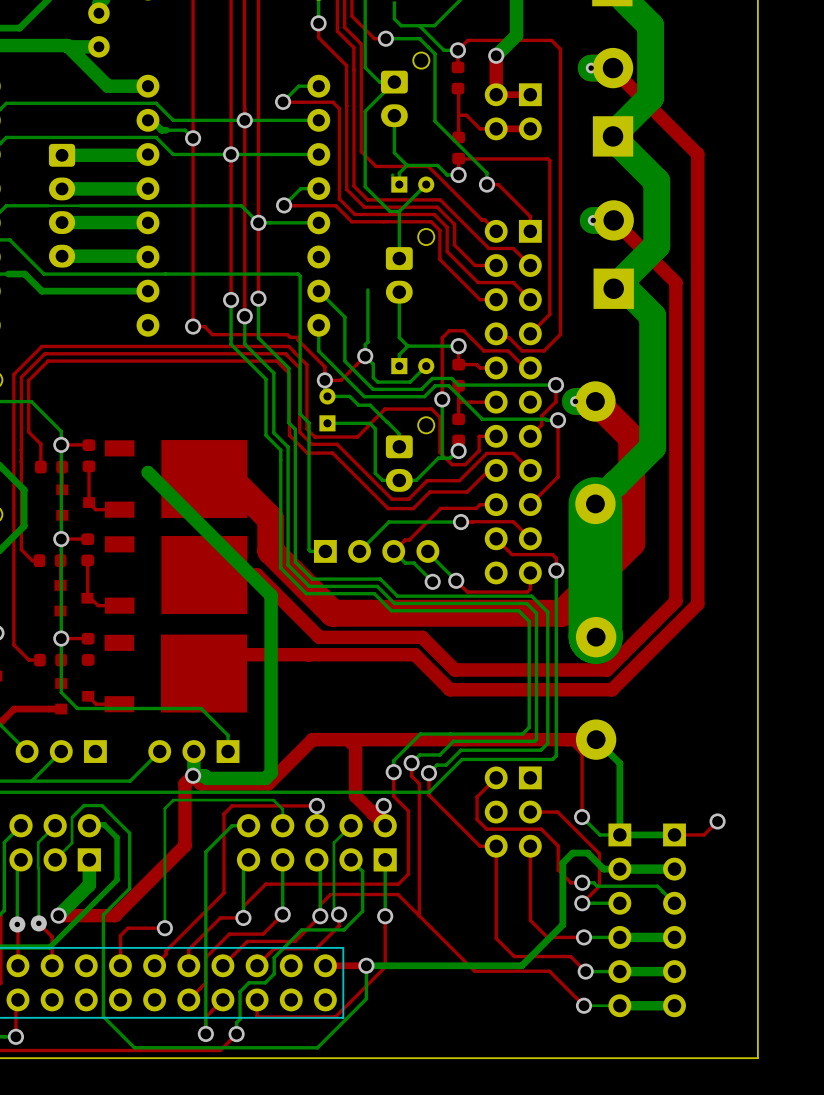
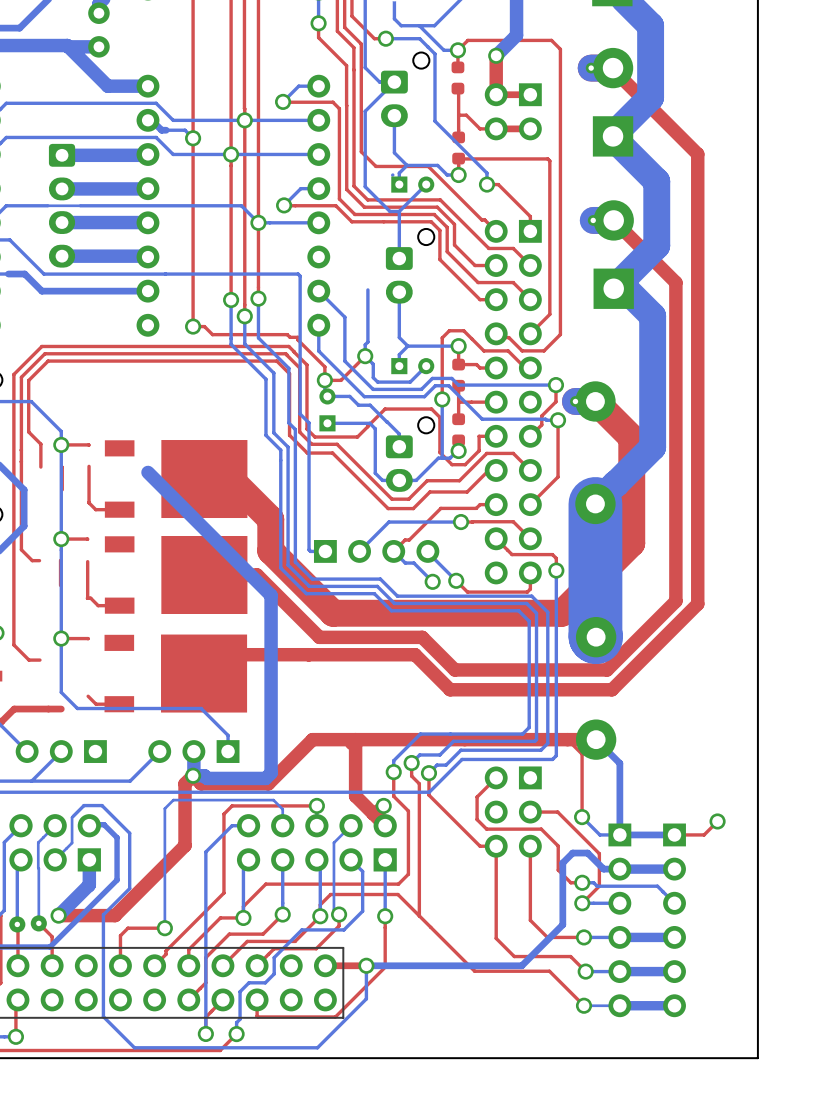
part: (89, 455) -> none
part: (51, 467) -> none
part: (75, 502) -> none
part: (87, 549) -> none
part: (50, 560) -> none
part: (74, 598) -> none
part: (88, 649) -> none
part: (50, 660) -> none
part: (74, 696) -> none

